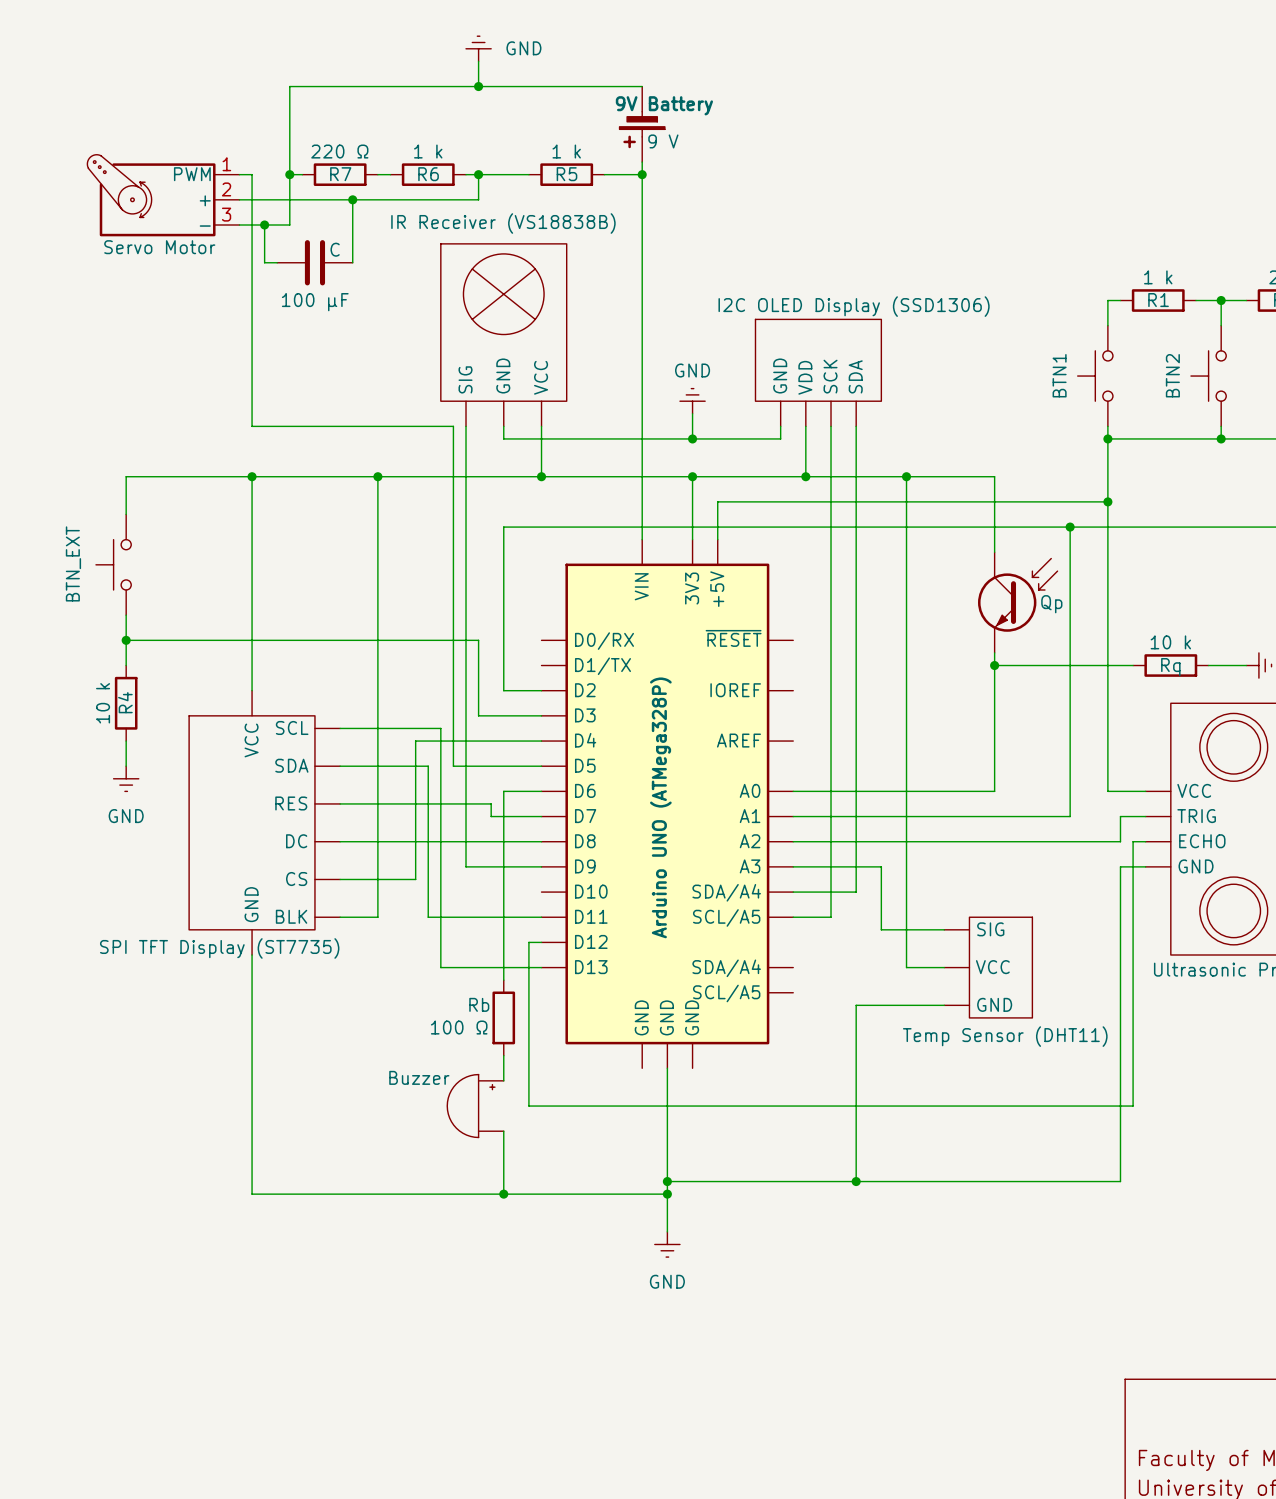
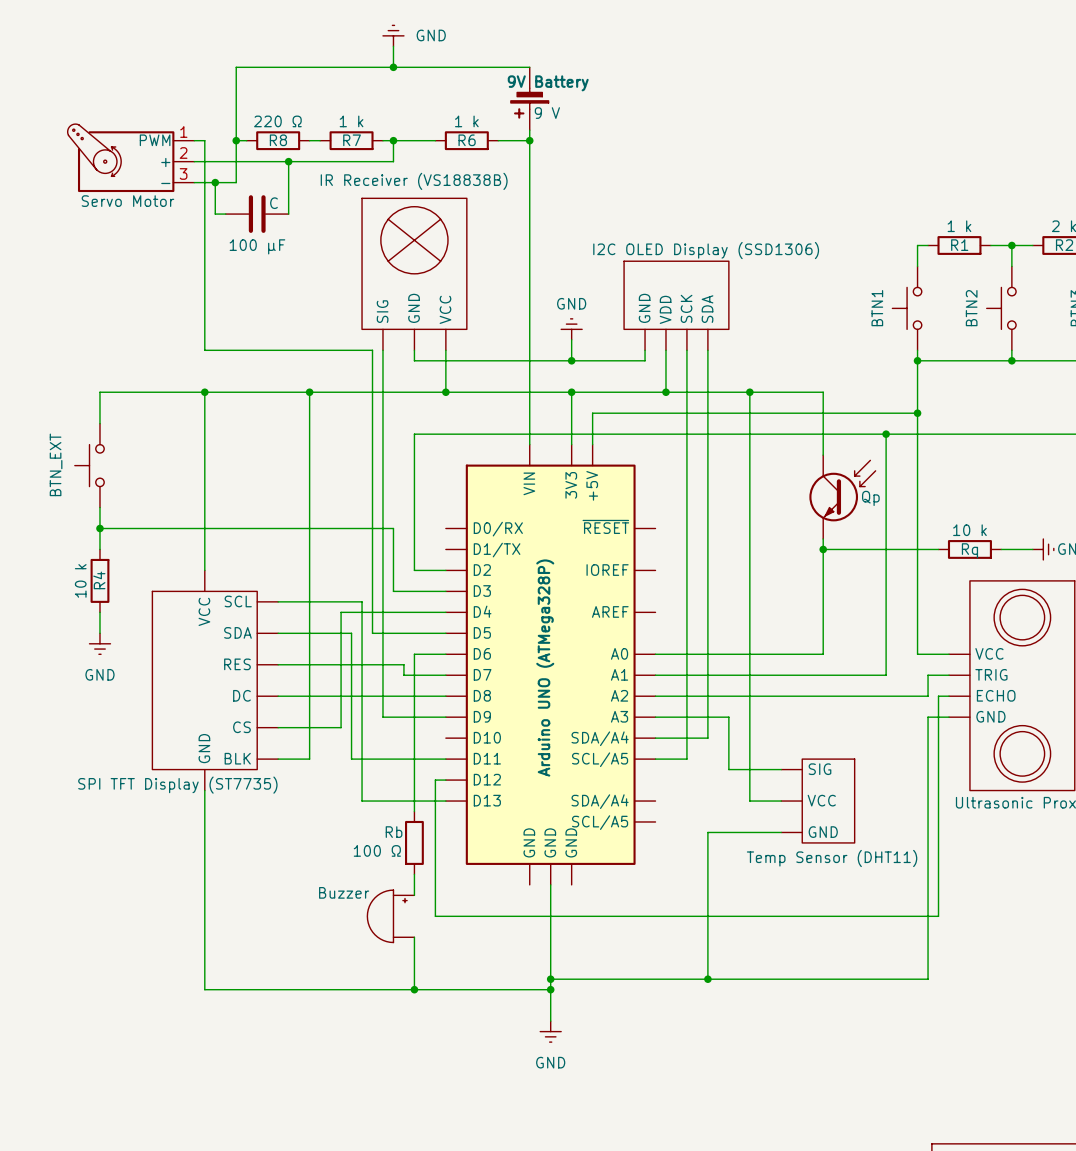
R7 name: R7 (340, 174) -> R8 (278, 140)
R6 name: R6 (428, 174) -> R7 (352, 140)
R5 name: R5 (566, 174) -> R6 (467, 140)

